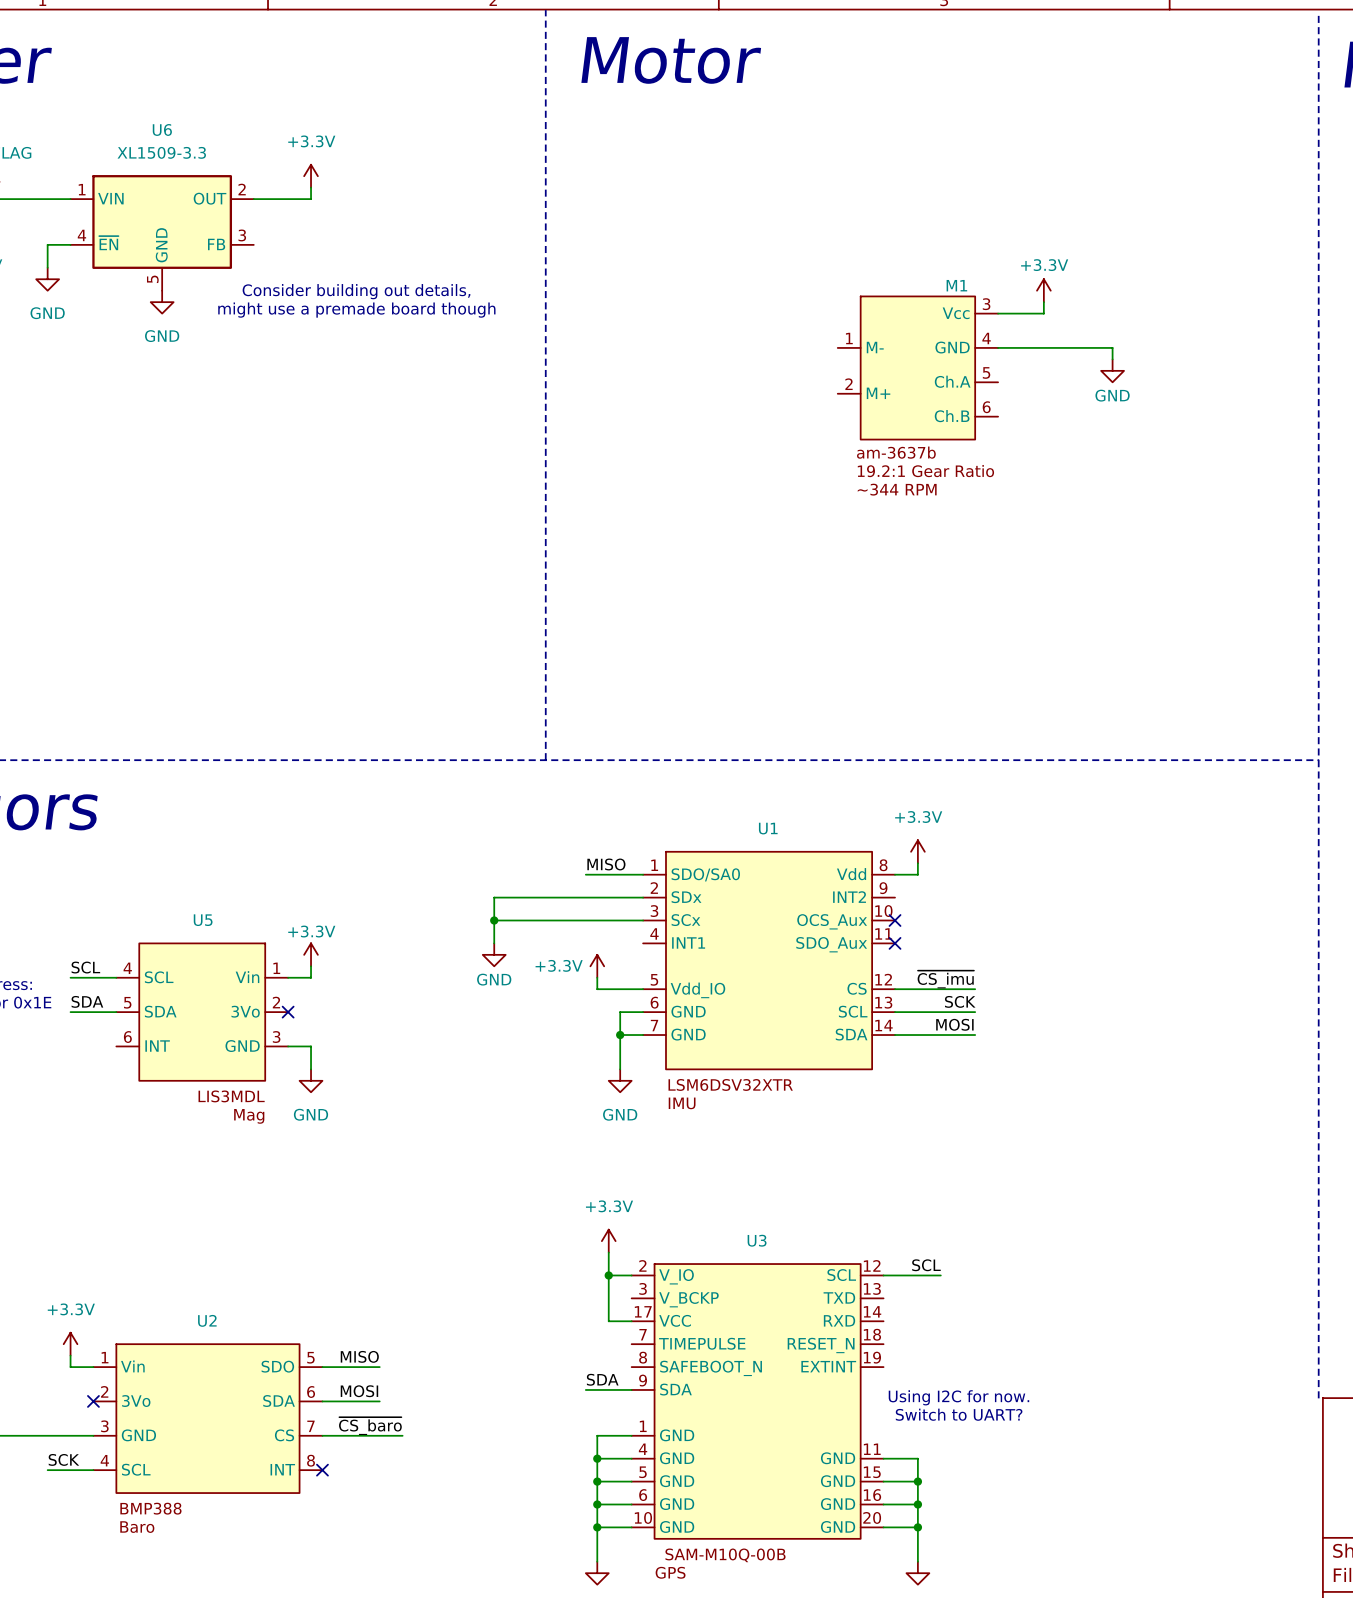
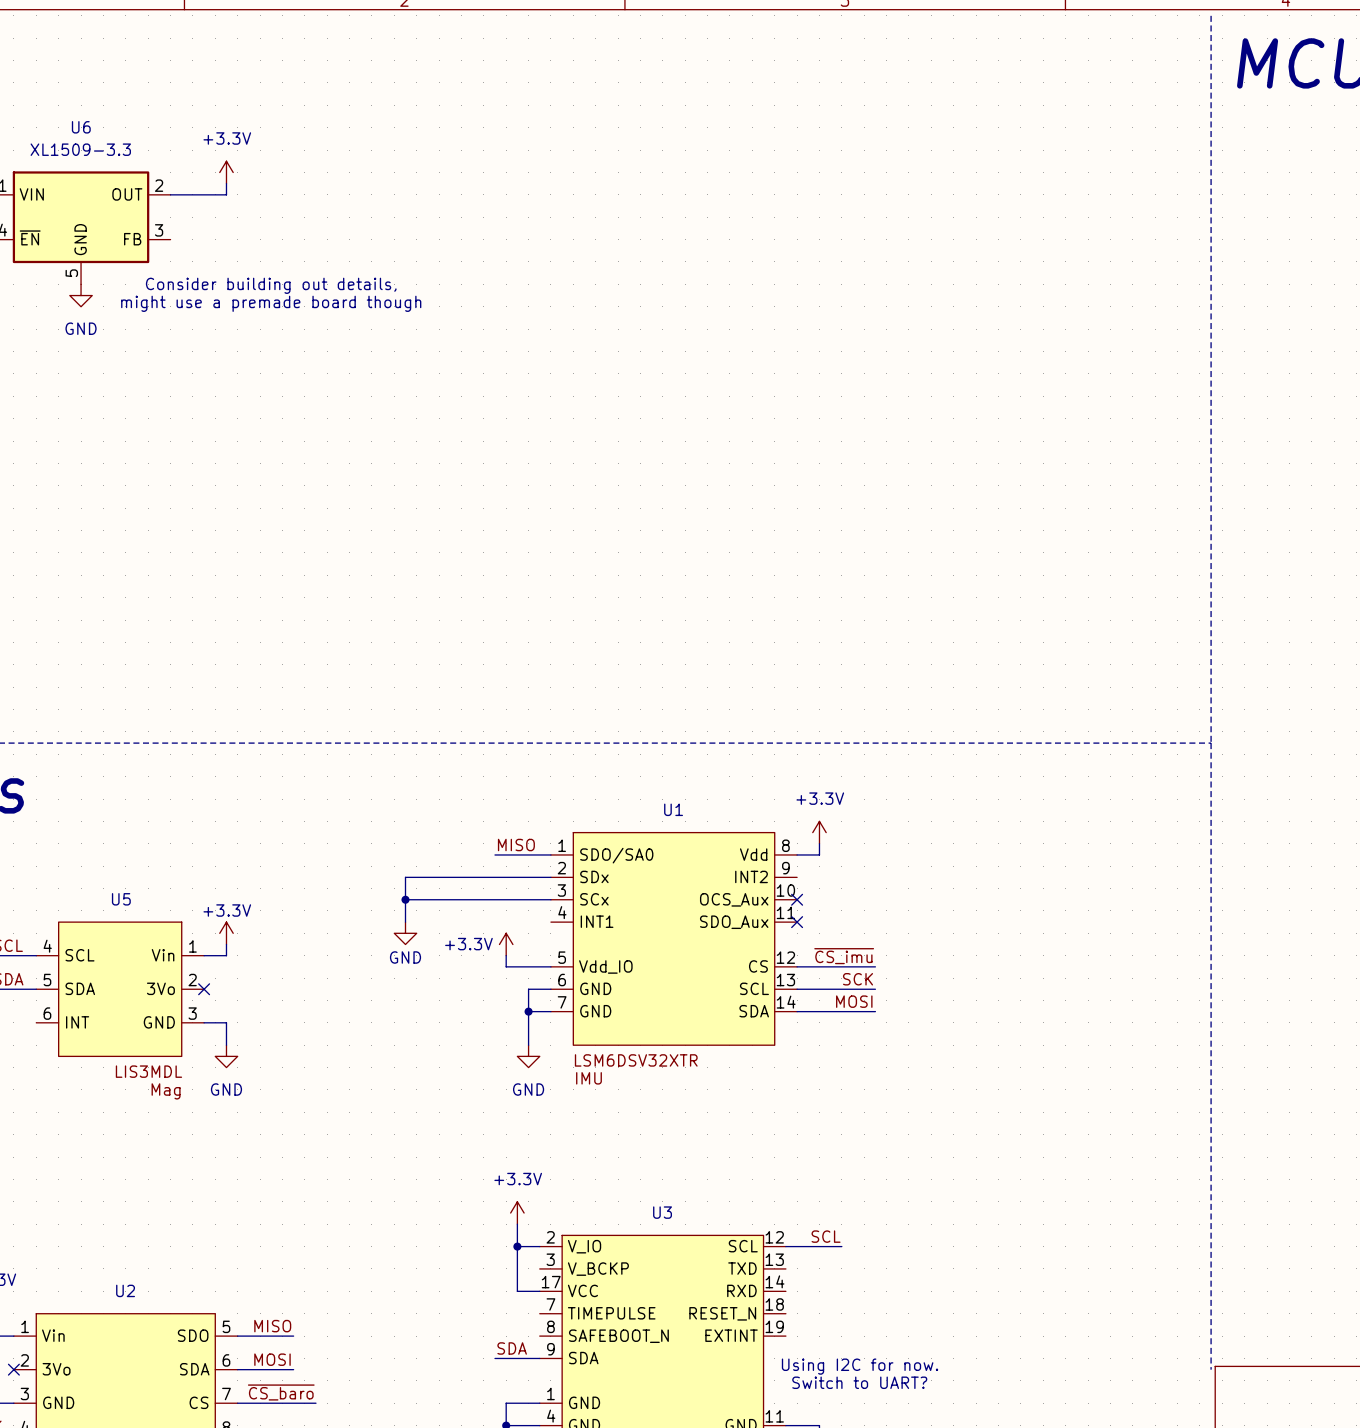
line: (545, 10) (545, 760) -> none
text: Motor (671, 60) -> none
power symbol: +3.3V (1043, 290) -> none
wire: (1043, 302) (1043, 313) (998, 313) -> none
wire: (998, 347) (1112, 347) (1112, 359) -> none
M1: (917, 367) -> none
power symbol: GND (1112, 370) -> none

